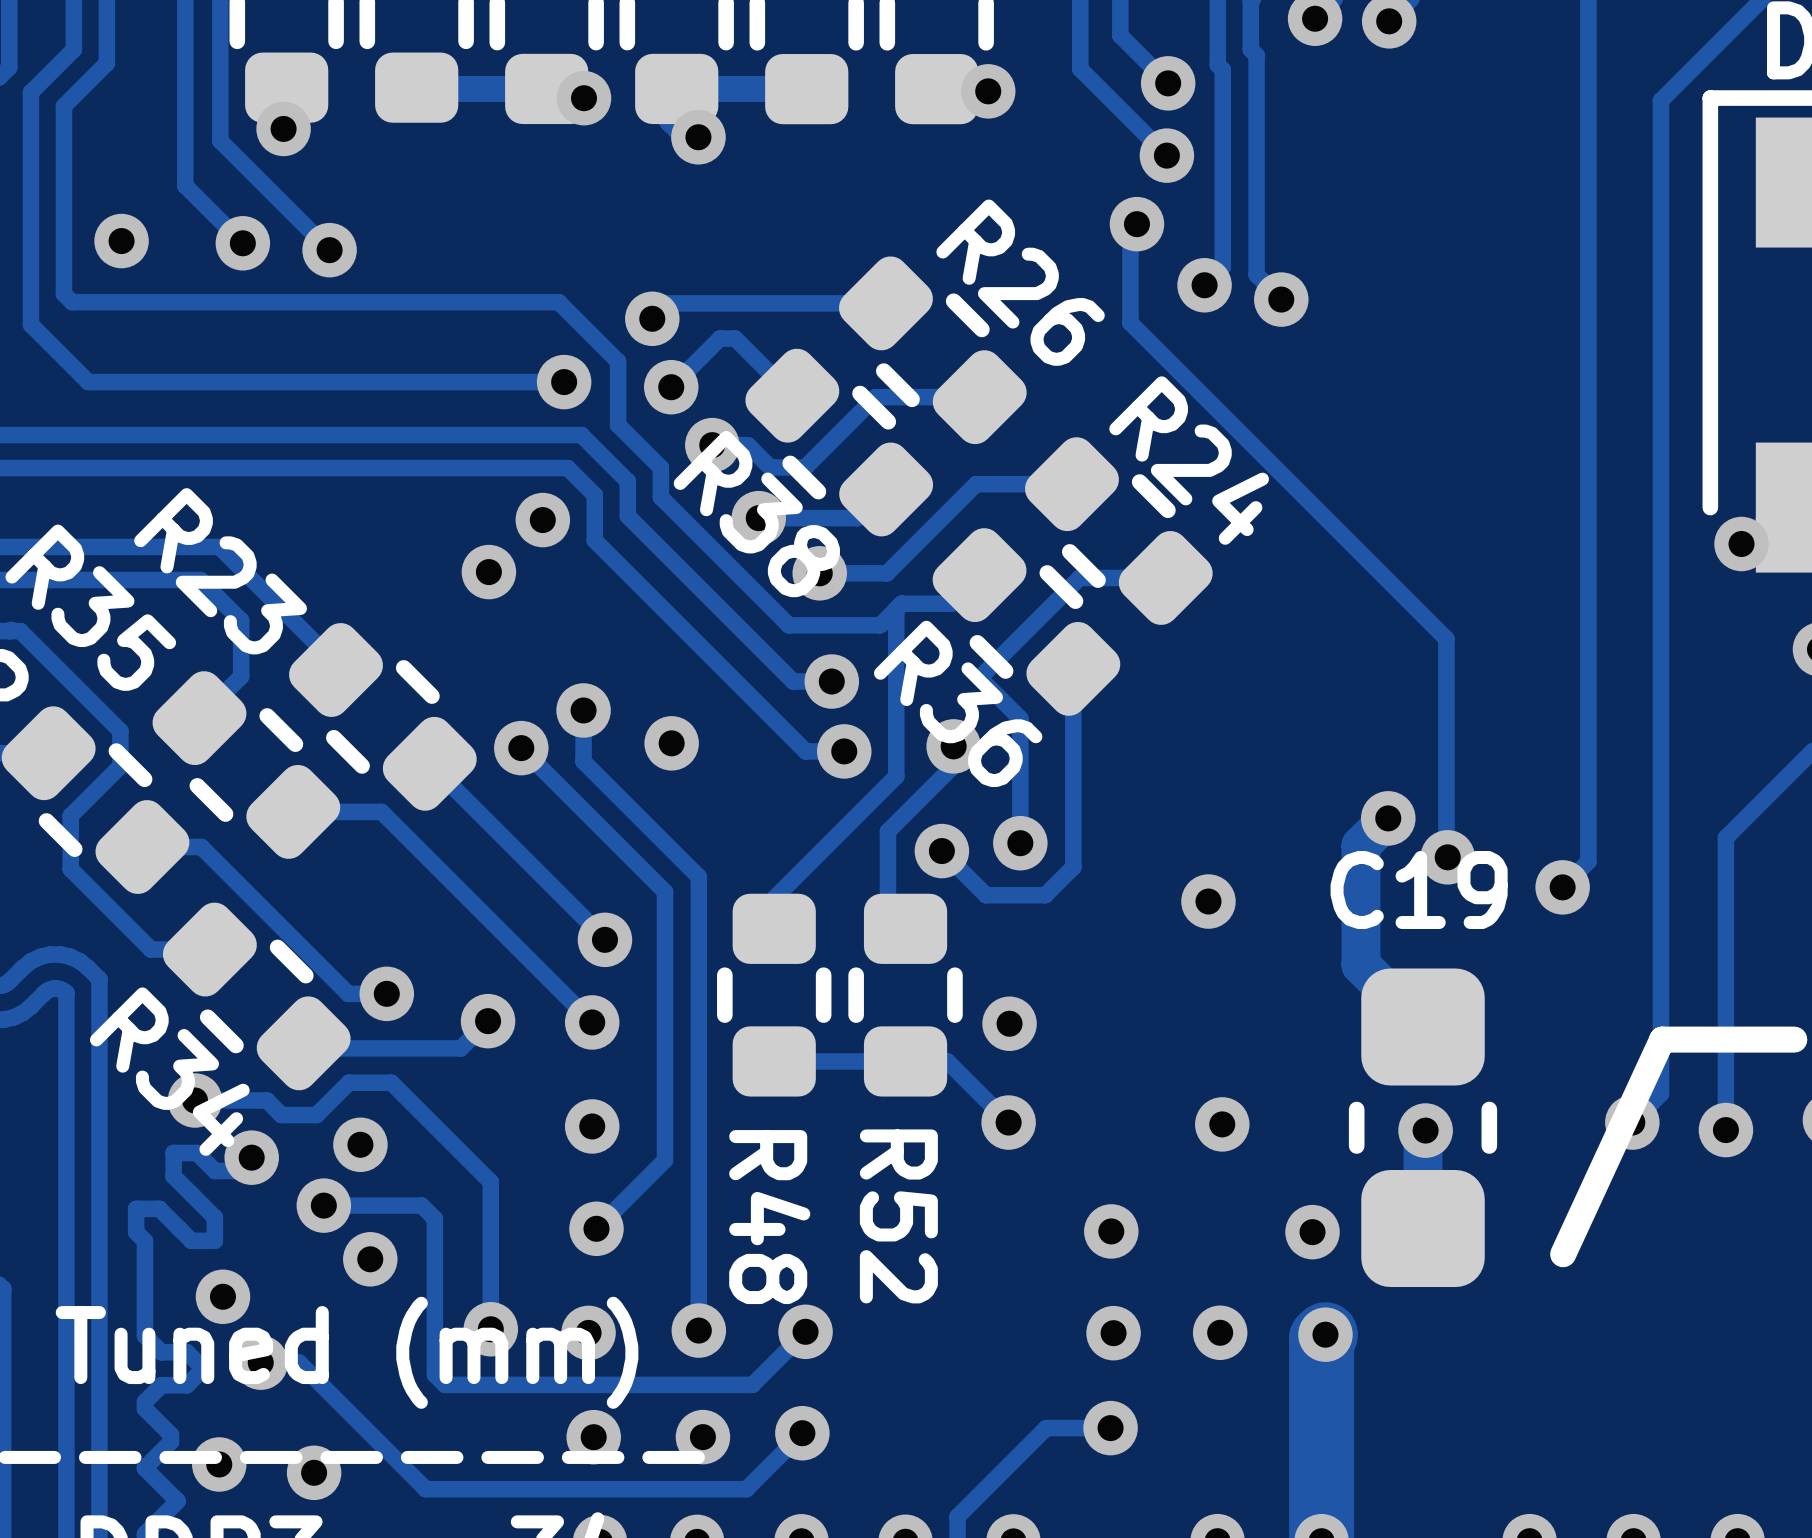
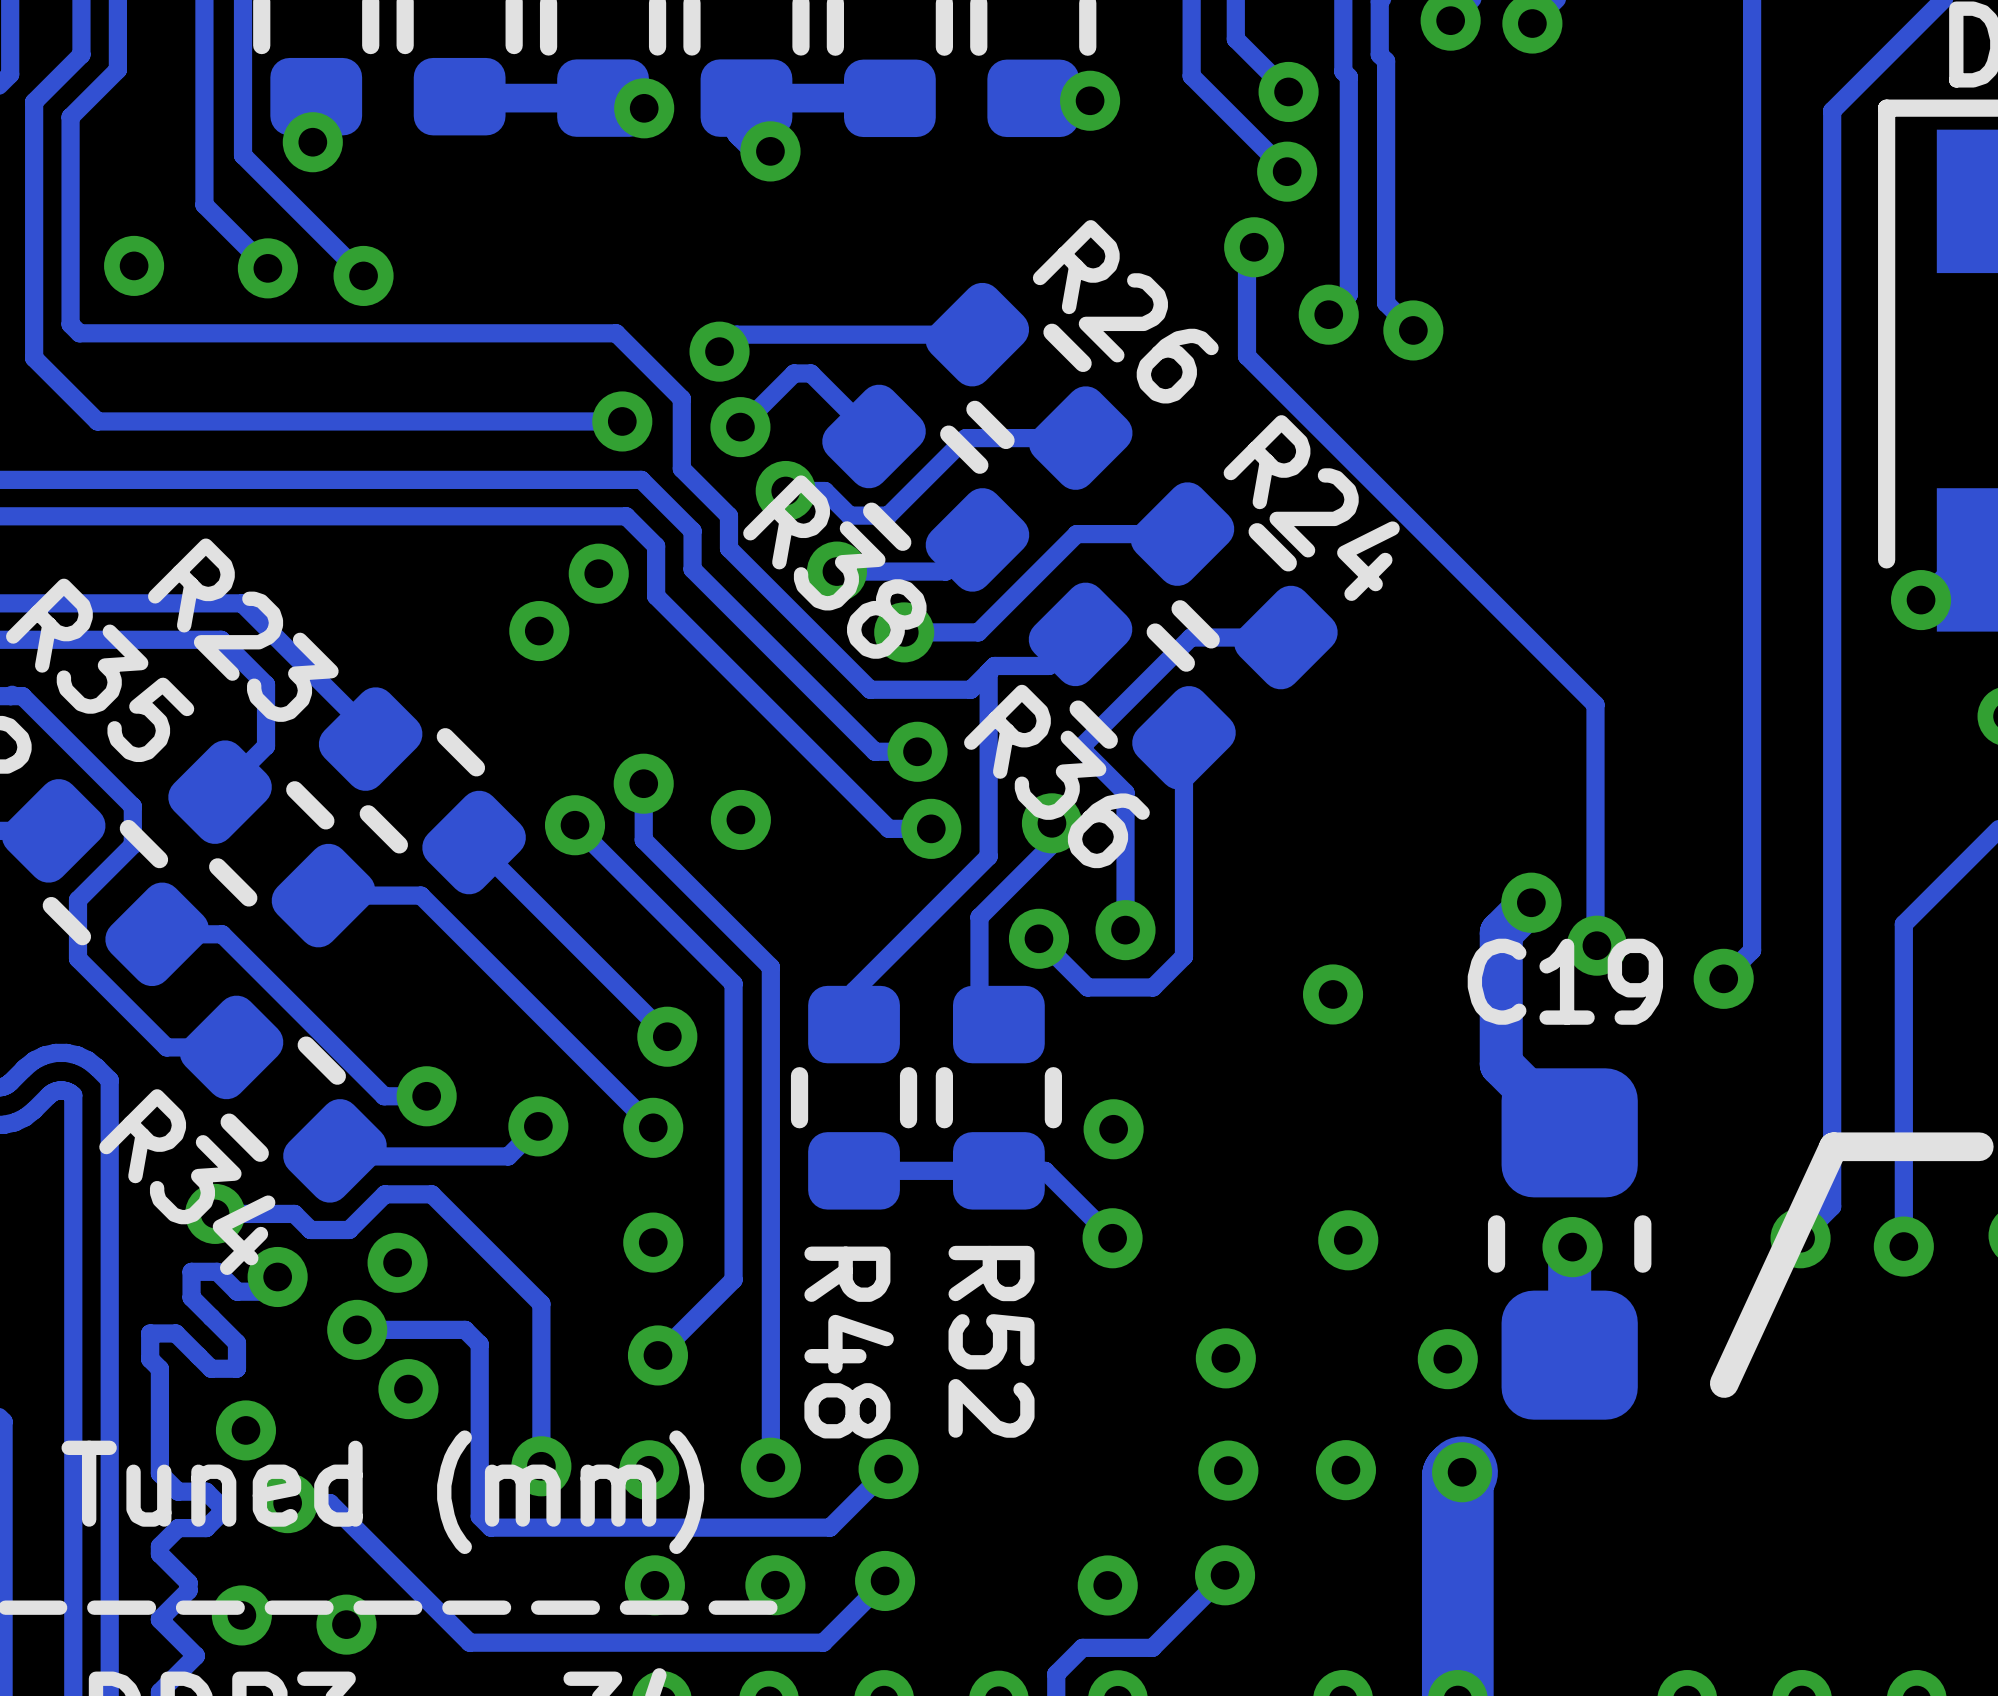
track: (1110, 1428) (1046, 1428) (957, 1516) -> (1225, 1575) (1152, 1647) (1082, 1647) (1056, 1674)
via: none -> (1107, 1585)

